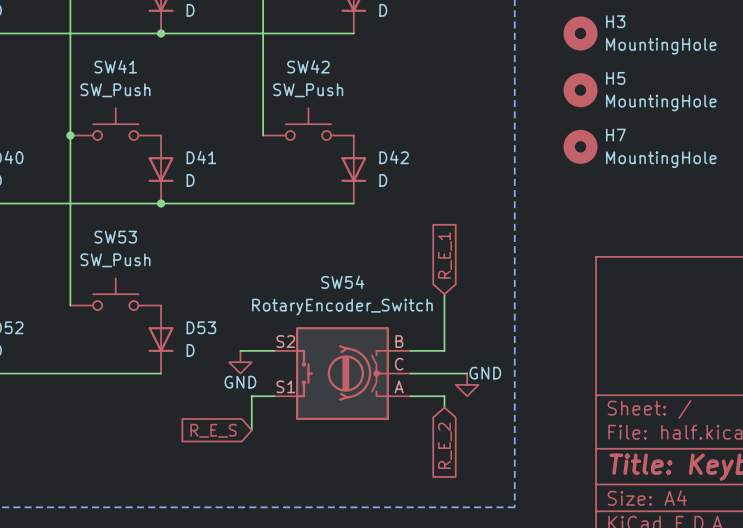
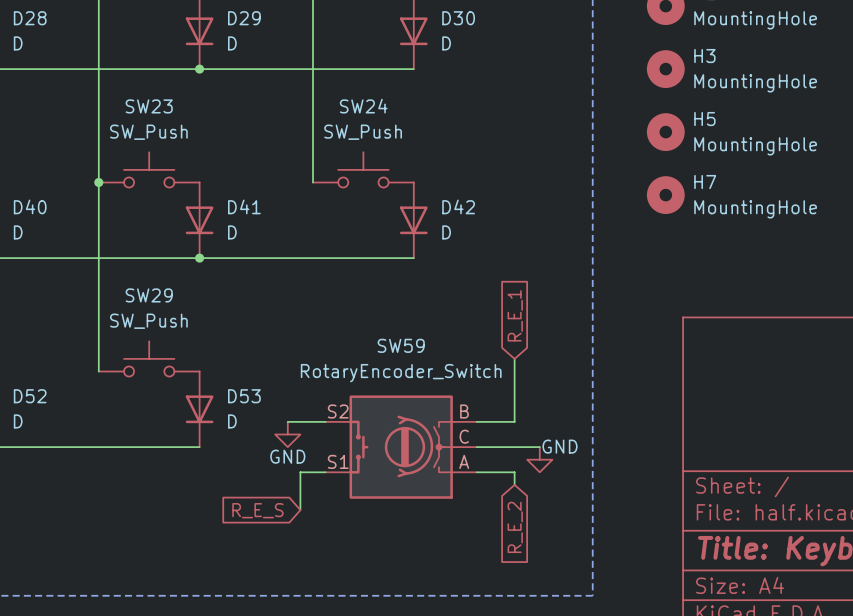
SW41 name: SW41 (115, 66) -> SW23 (149, 106)
SW42 name: SW42 (308, 66) -> SW24 (363, 106)
SW53 name: SW53 (115, 237) -> SW29 (149, 295)
SW54 name: SW54 (342, 282) -> SW59 (401, 345)

